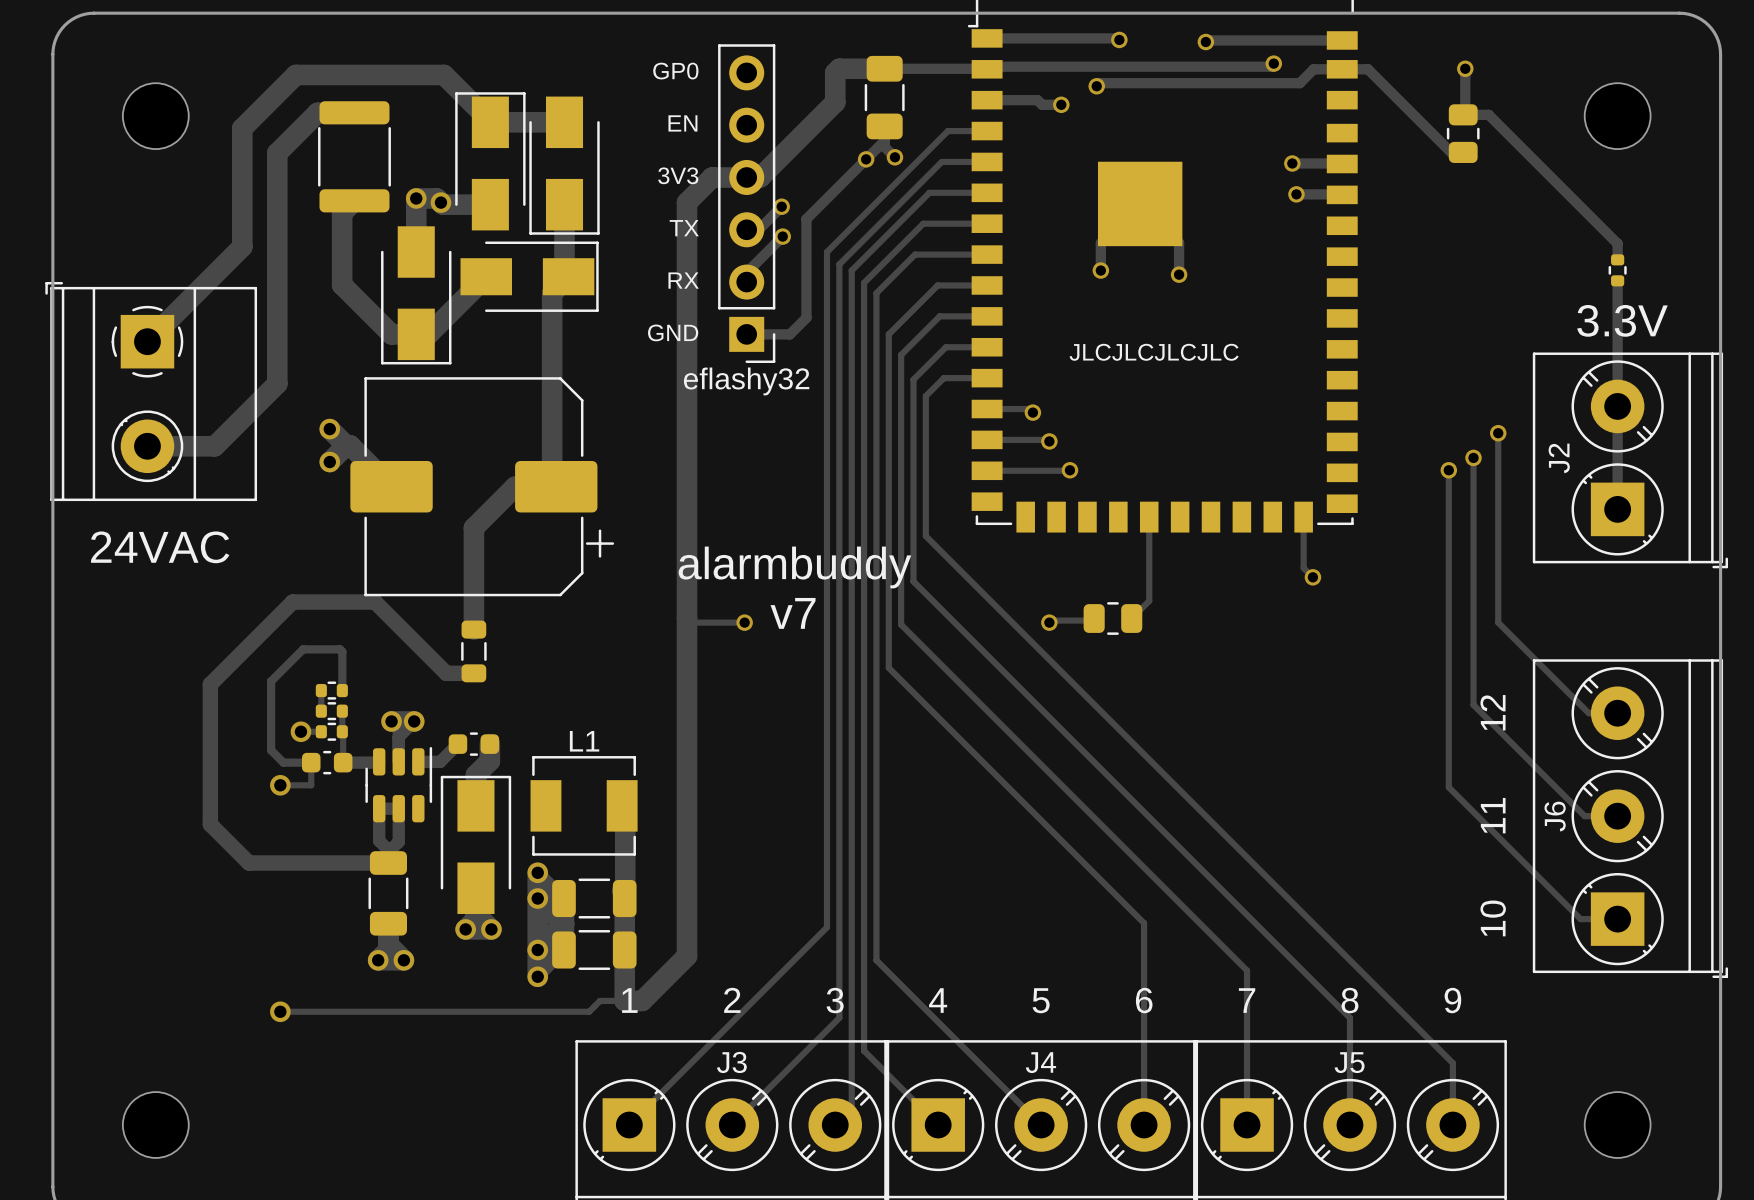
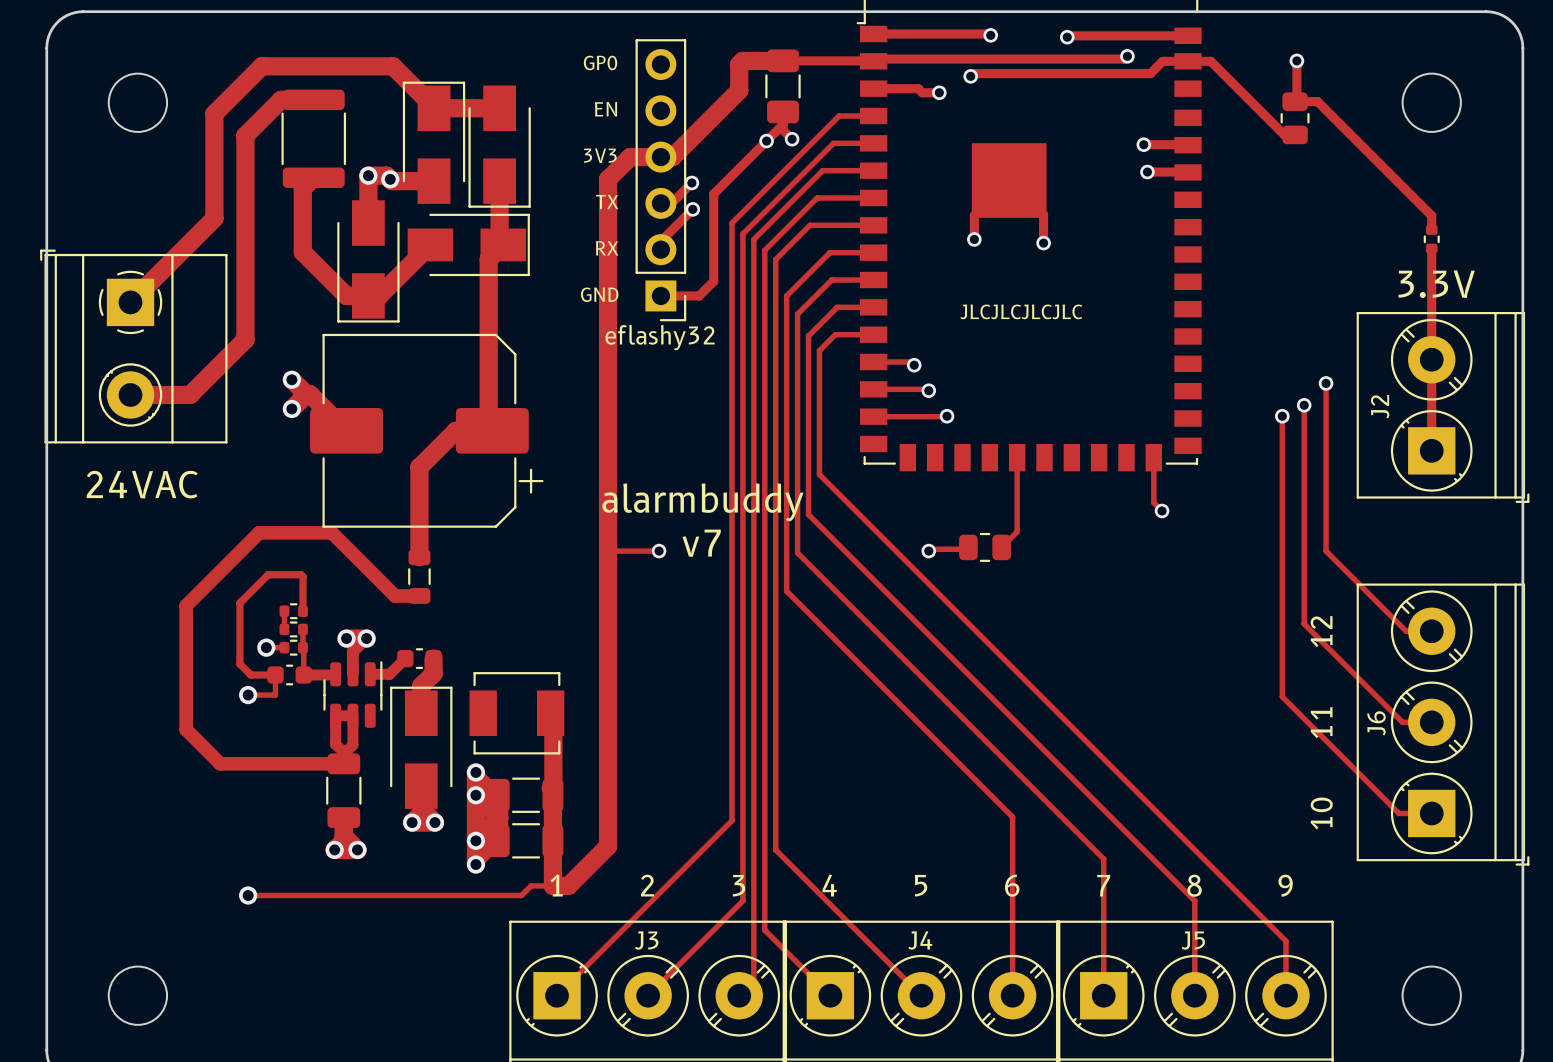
L1: (584, 805) -> none
part: none -> (516, 713)

